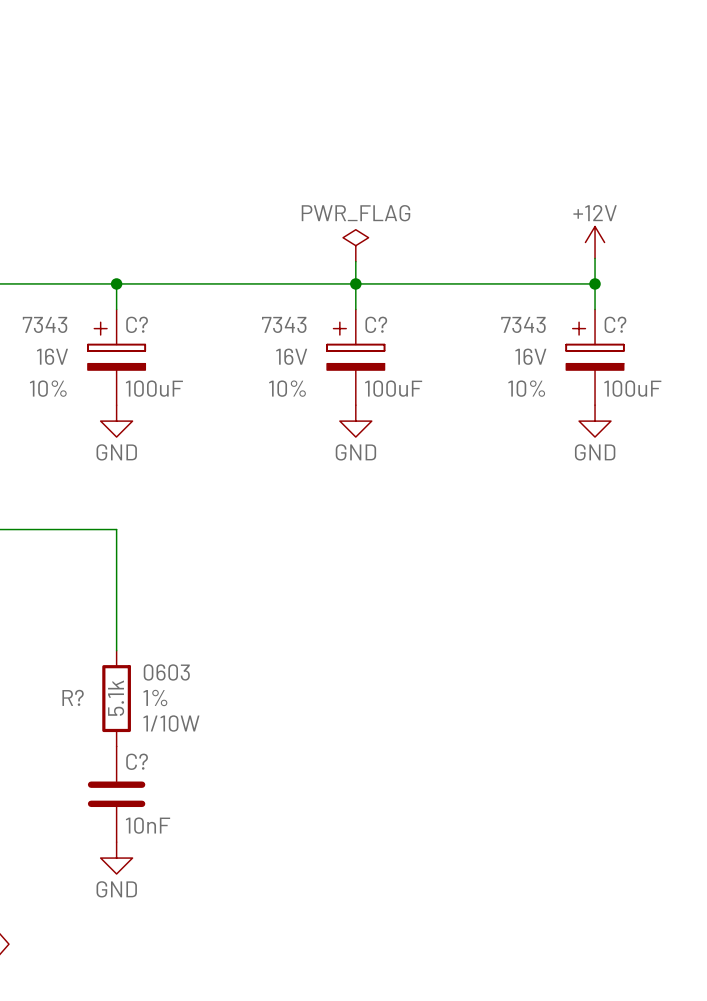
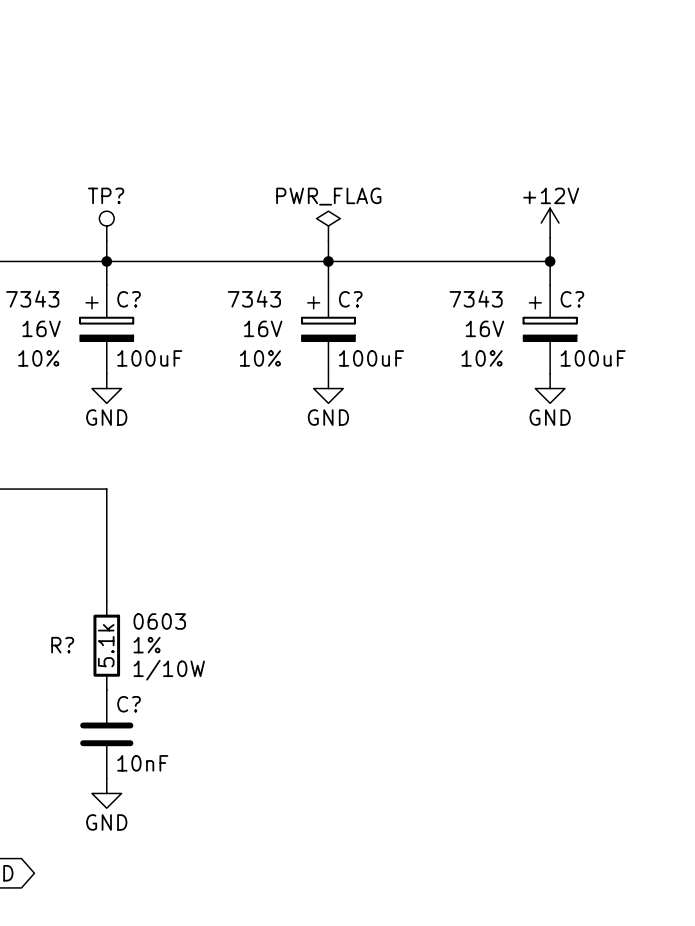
TP?: none -> (106, 225)
wire: none -> (106, 240) (106, 261)

